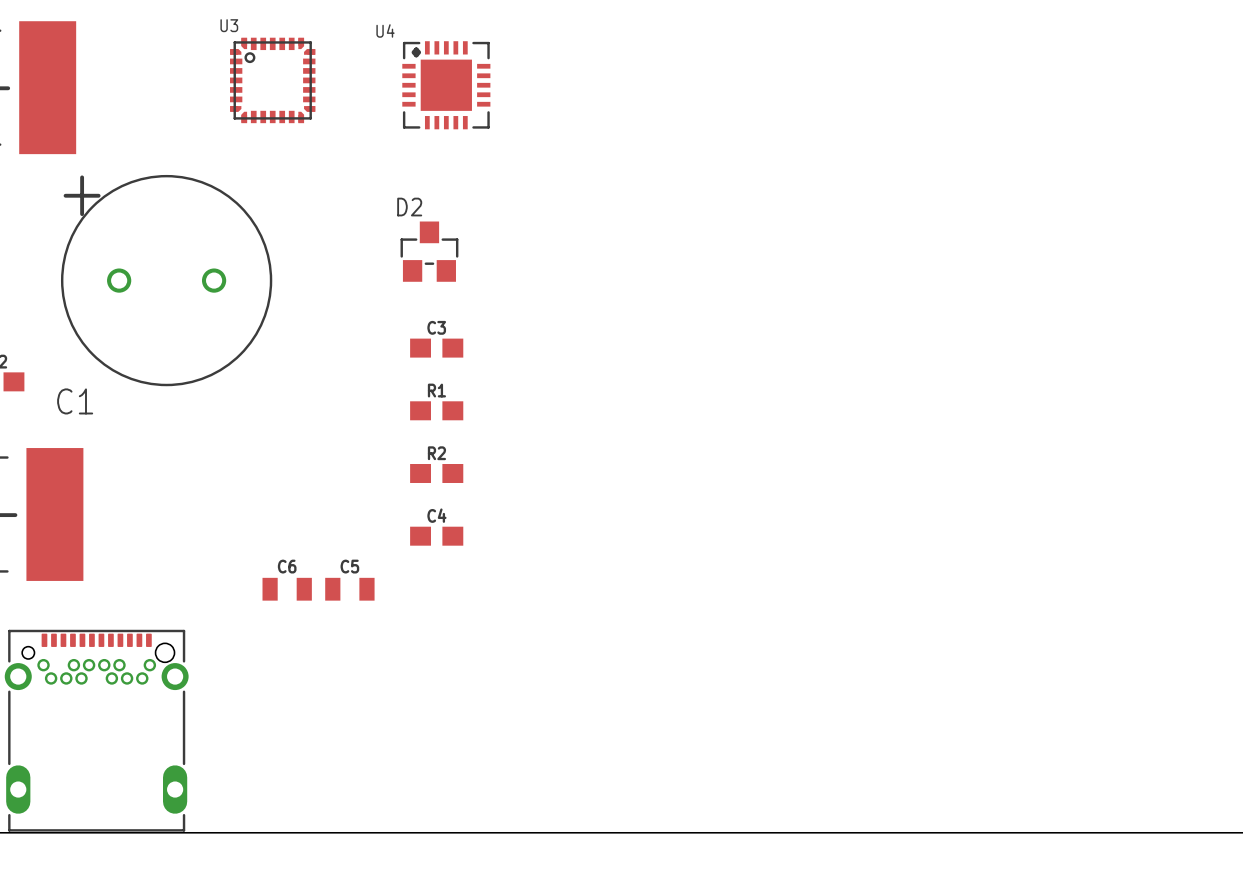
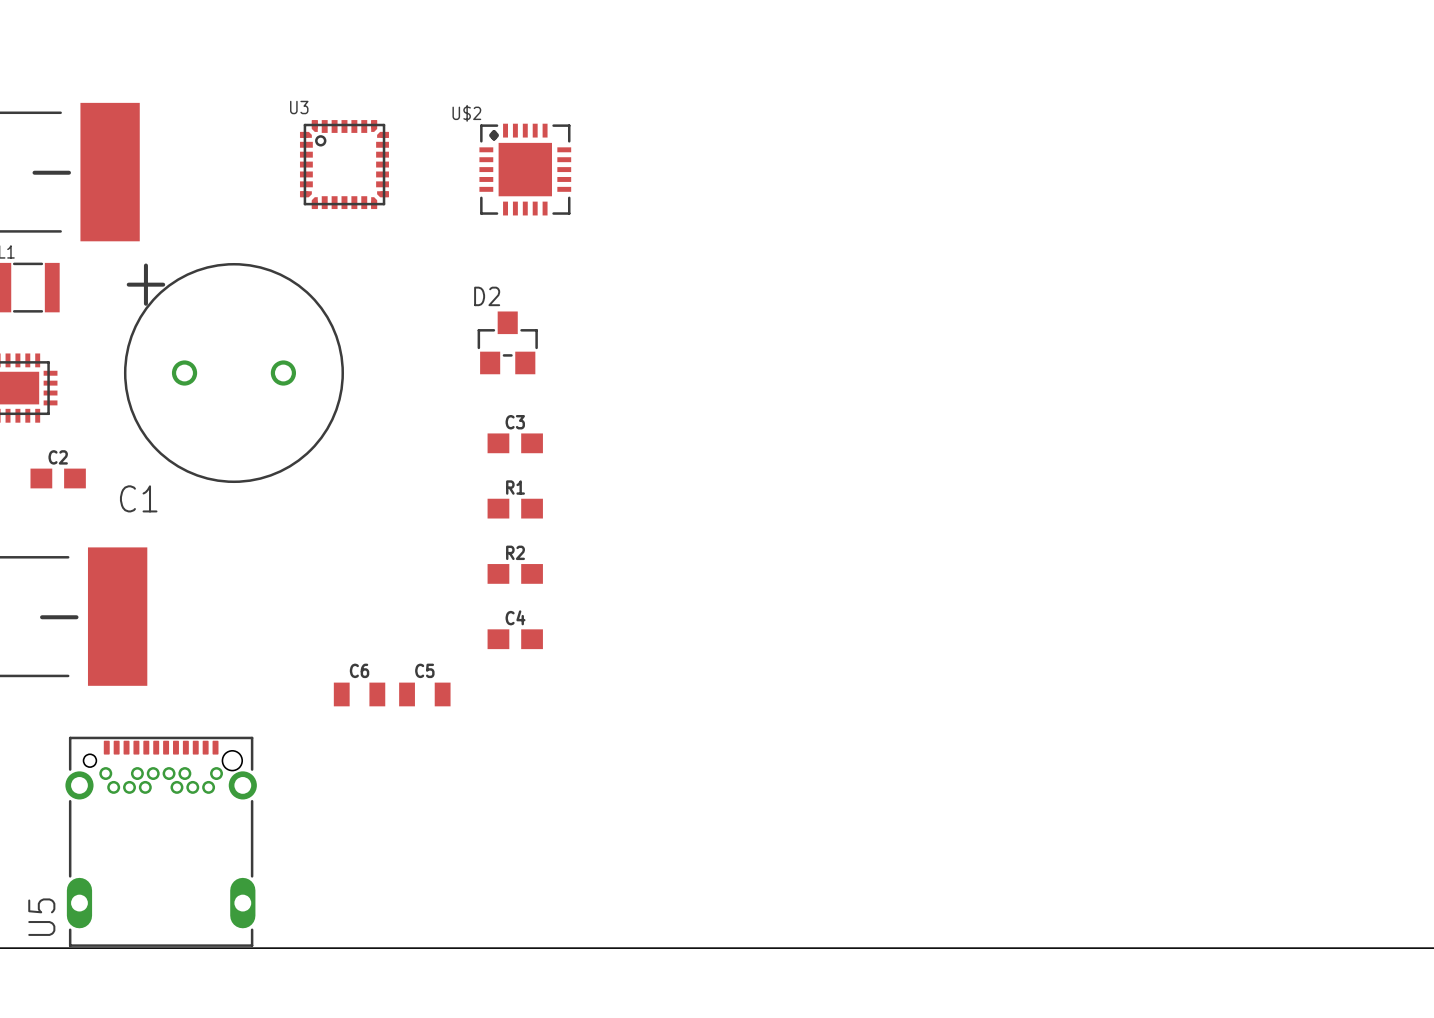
U4 name: U4 (385, 30) -> U$2 (466, 113)

